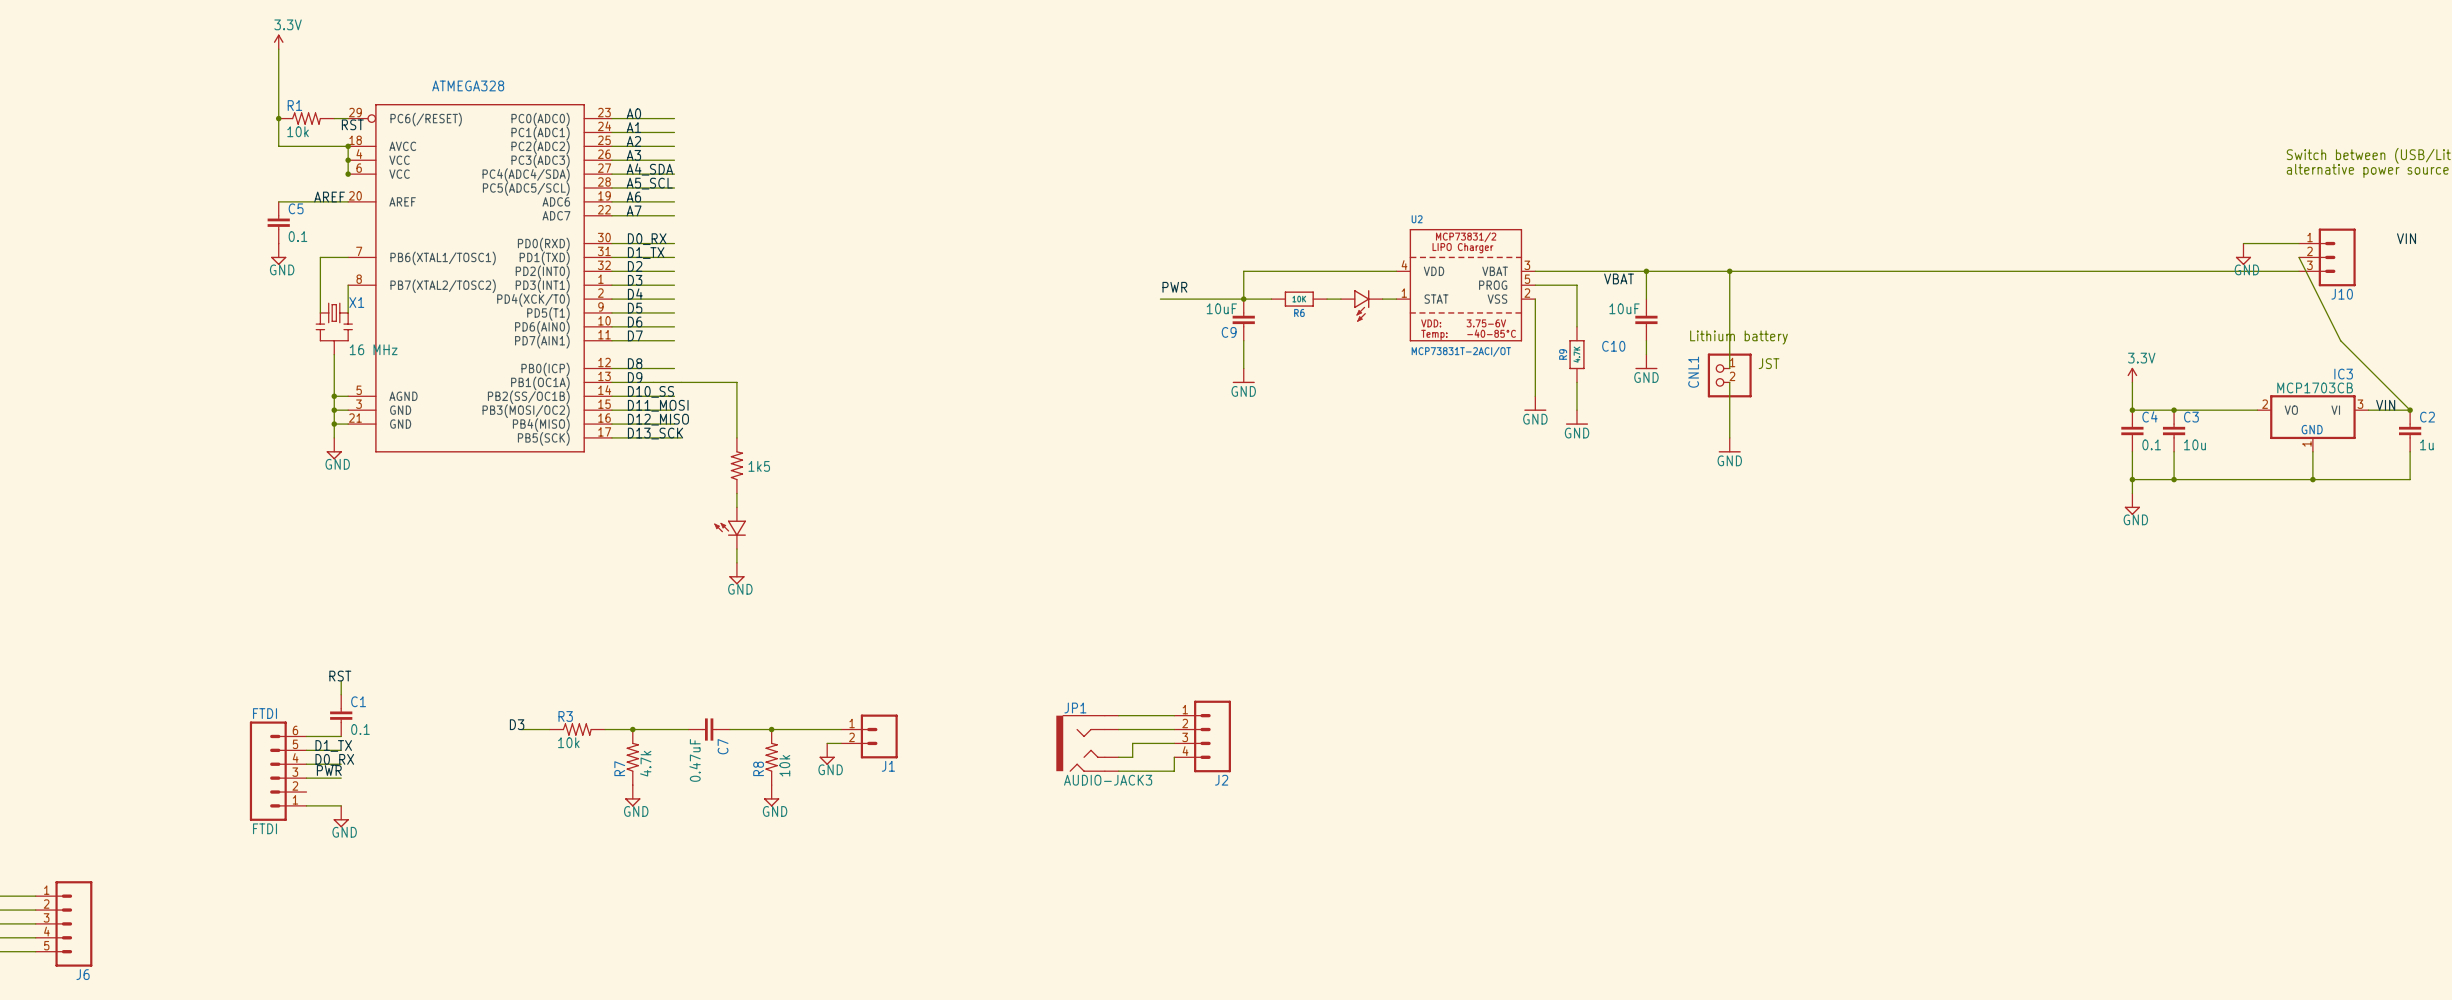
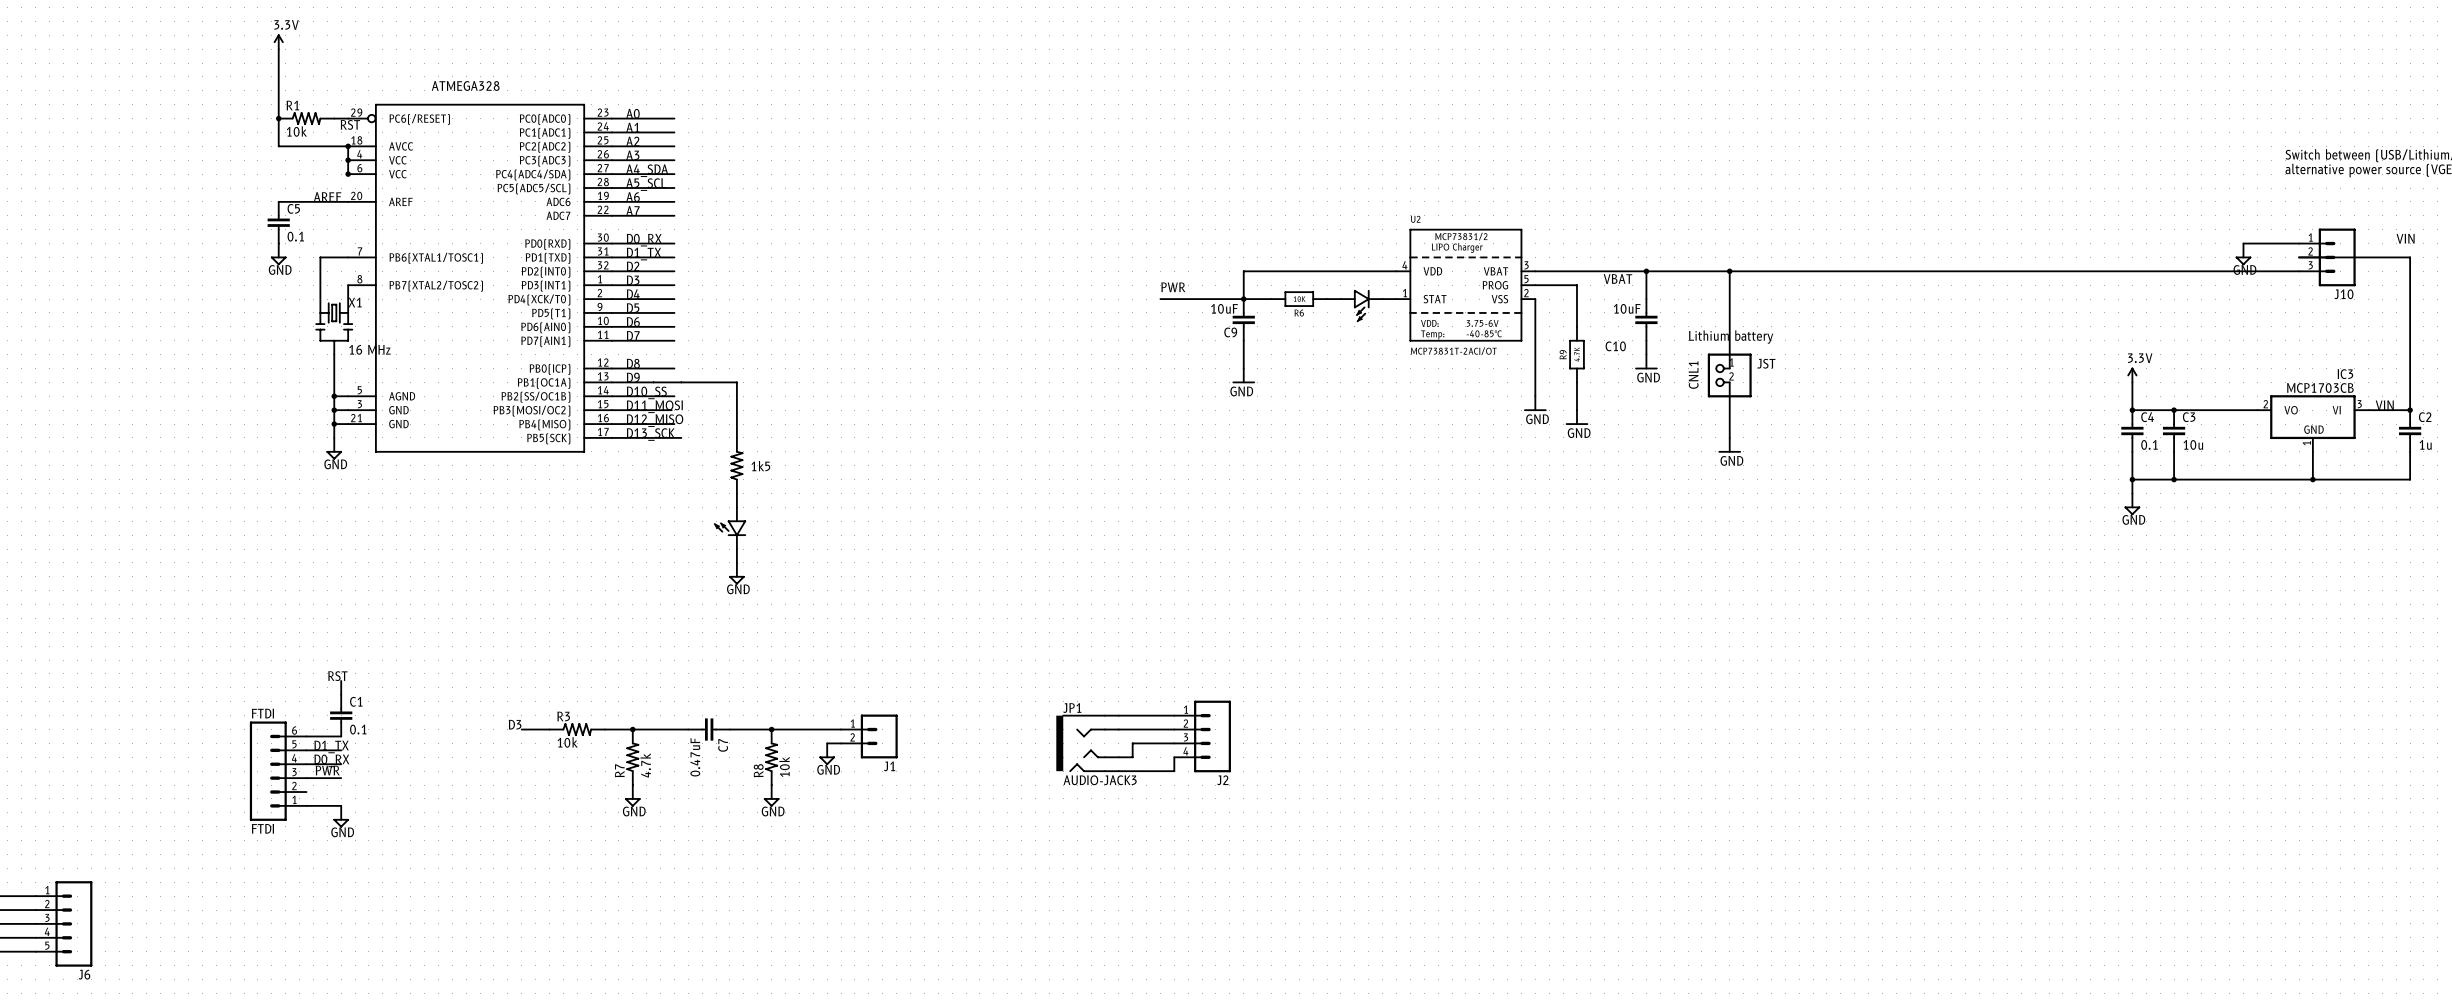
wire: (2299, 257) (2340, 340) (2410, 410) -> (2299, 257) (2410, 257) (2410, 410)

